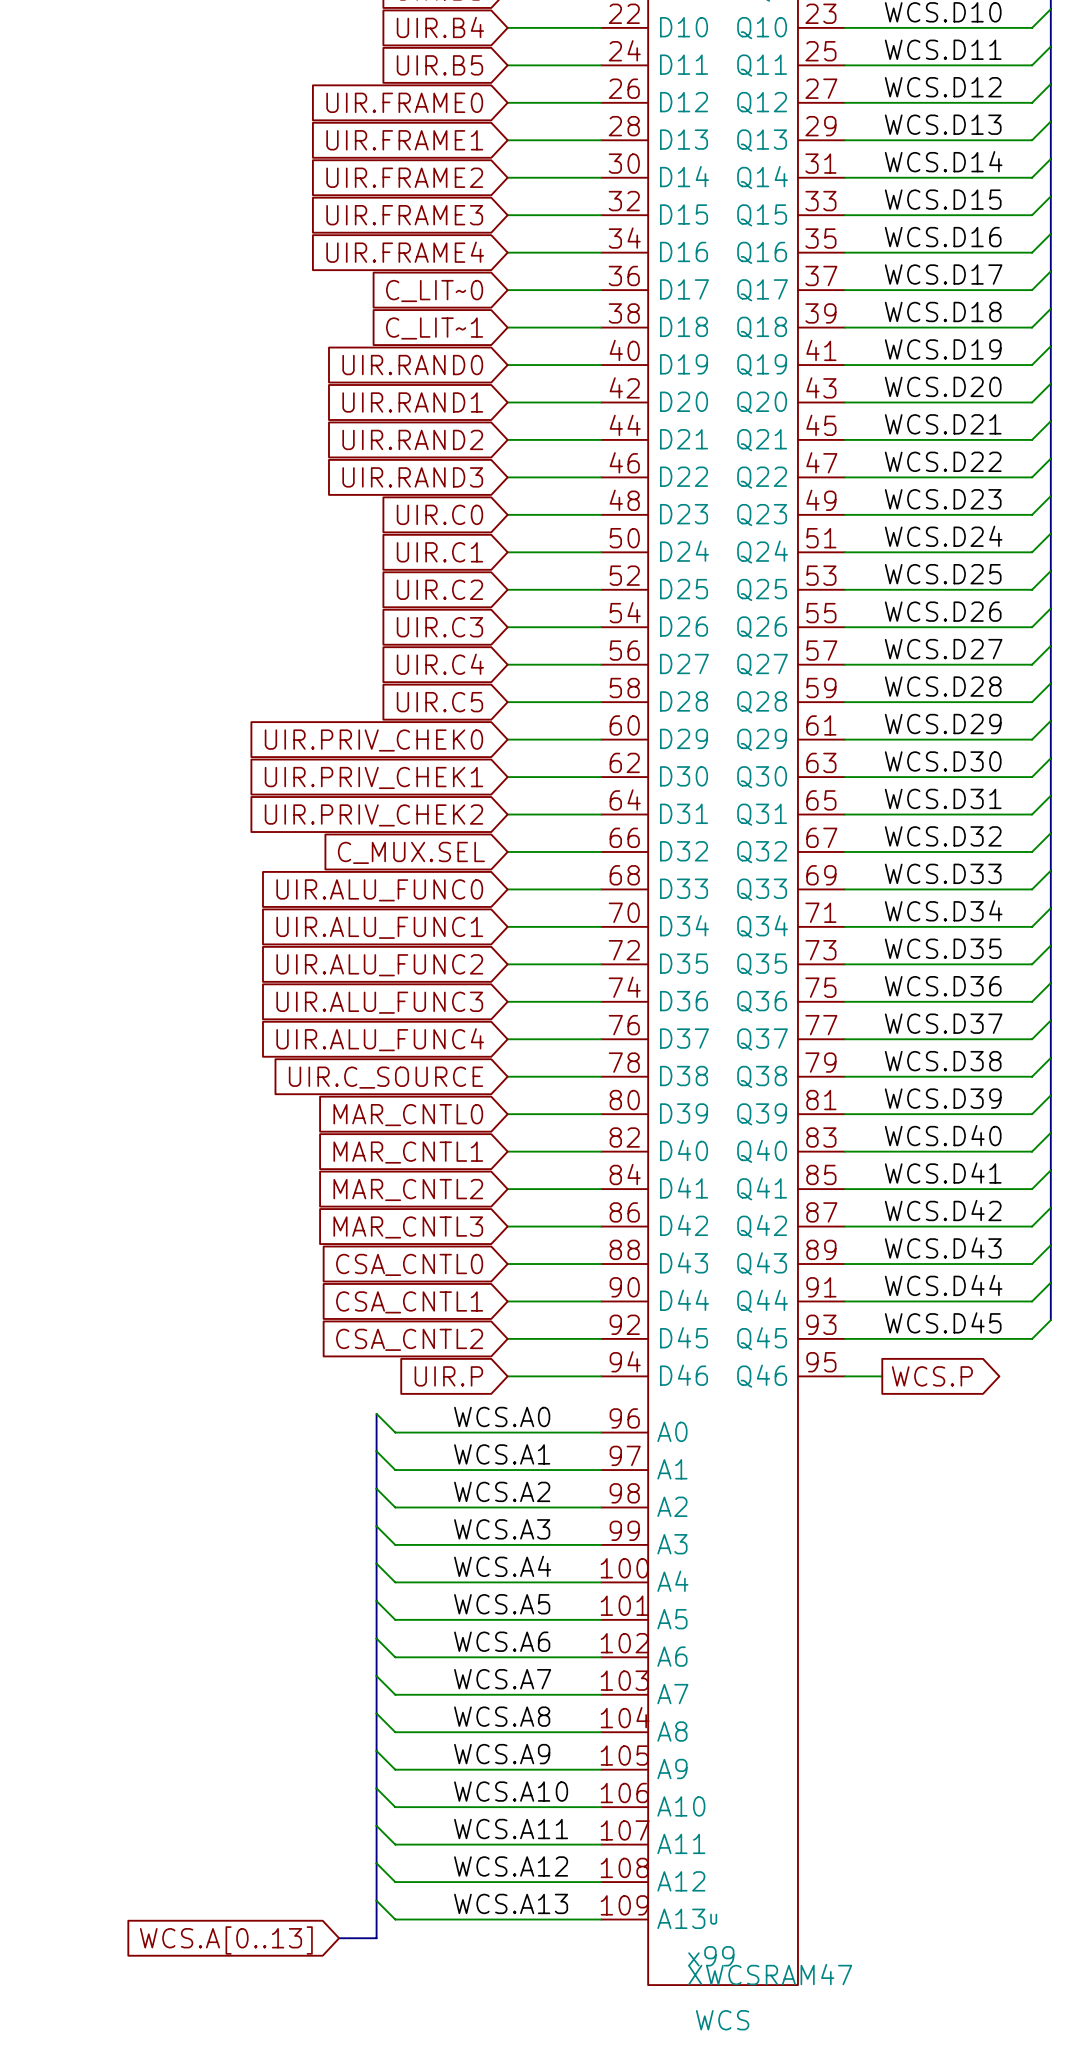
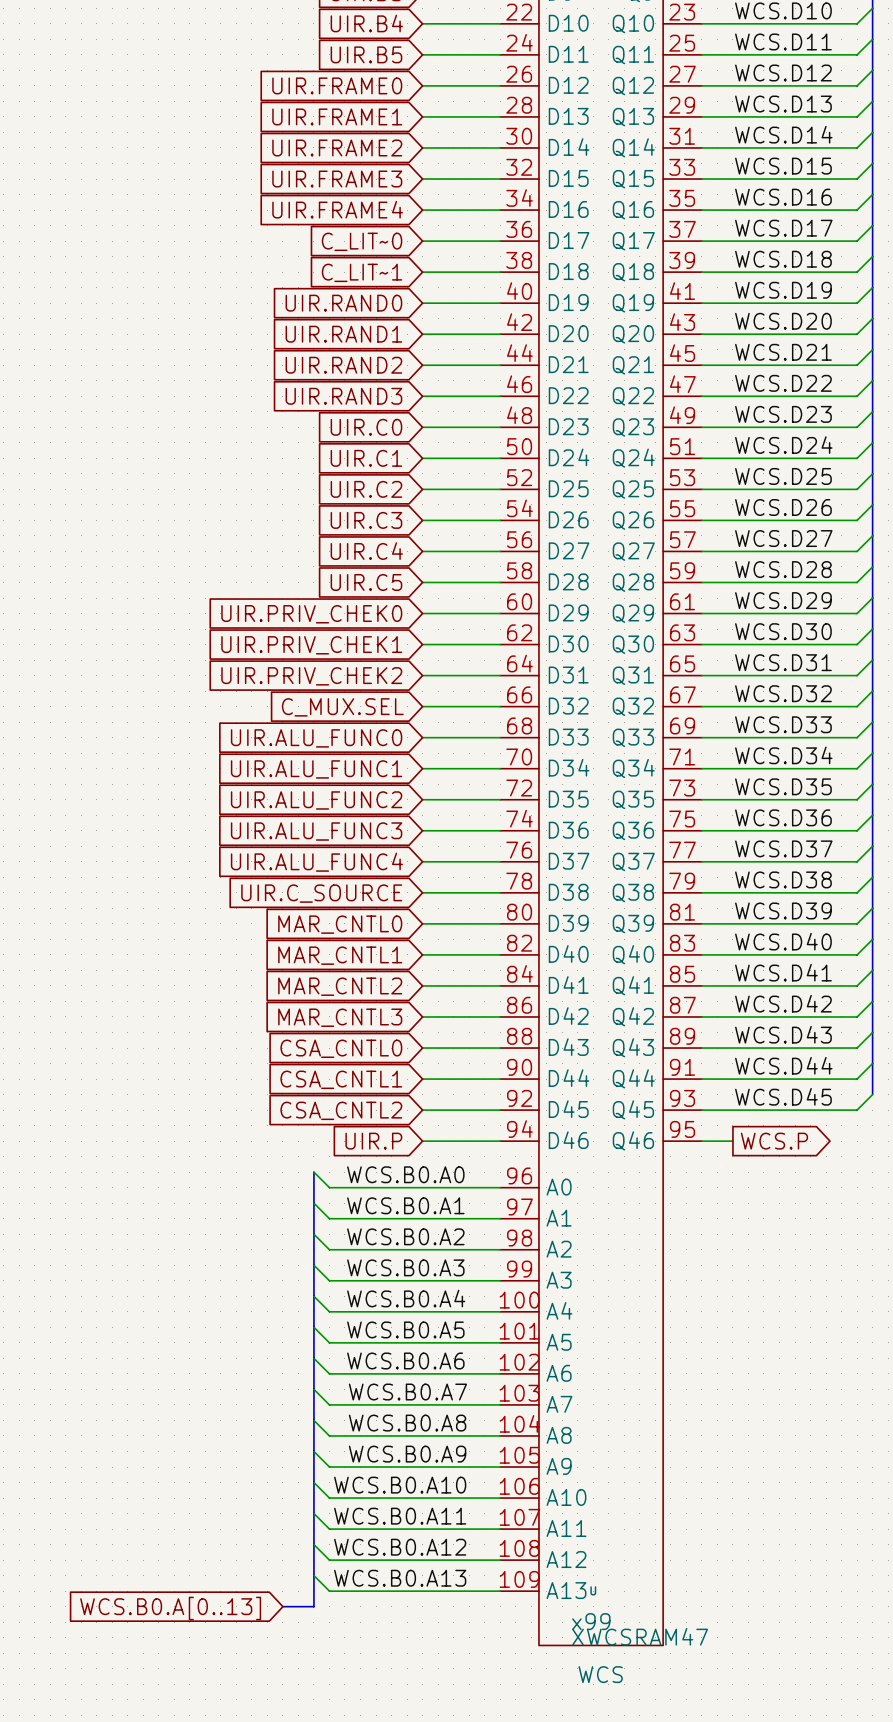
label: none -> WCS.B0.A0 (405, 1174)
label: WCS.A0 (502, 1416) -> none
label: none -> WCS.B0.A1 (405, 1205)
label: WCS.A1 (502, 1454) -> none
label: none -> WCS.B0.A2 (405, 1236)
label: WCS.A2 (502, 1491) -> none
label: none -> WCS.B0.A3 (405, 1267)
label: WCS.A3 (502, 1529) -> none
label: none -> WCS.B0.A4 (406, 1298)
label: WCS.A4 (502, 1566) -> none
label: none -> WCS.B0.A5 (405, 1329)
label: WCS.A5 (502, 1604) -> none
label: none -> WCS.B0.A6 (405, 1360)
label: WCS.A6 (502, 1641) -> none
label: none -> WCS.B0.A7 (407, 1392)
label: WCS.A7 (502, 1679) -> none
label: none -> WCS.B0.A8 (407, 1423)
label: WCS.A8 (502, 1716) -> none
label: none -> WCS.B0.A9 (407, 1454)
label: WCS.A9 (502, 1754) -> none
label: none -> WCS.B0.A10 (400, 1485)
label: WCS.A10 (511, 1791) -> none
label: none -> WCS.B0.A11 (400, 1516)
label: WCS.A11 (511, 1829) -> none
label: none -> WCS.B0.A12 (400, 1547)
label: WCS.A12 (511, 1866) -> none
label: none -> WCS.B0.A13 (400, 1578)
label: WCS.A13 (511, 1903) -> none
global label: WCS.A[0..13] (226, 1940) -> WCS.B0.A[0..13] (170, 1608)

